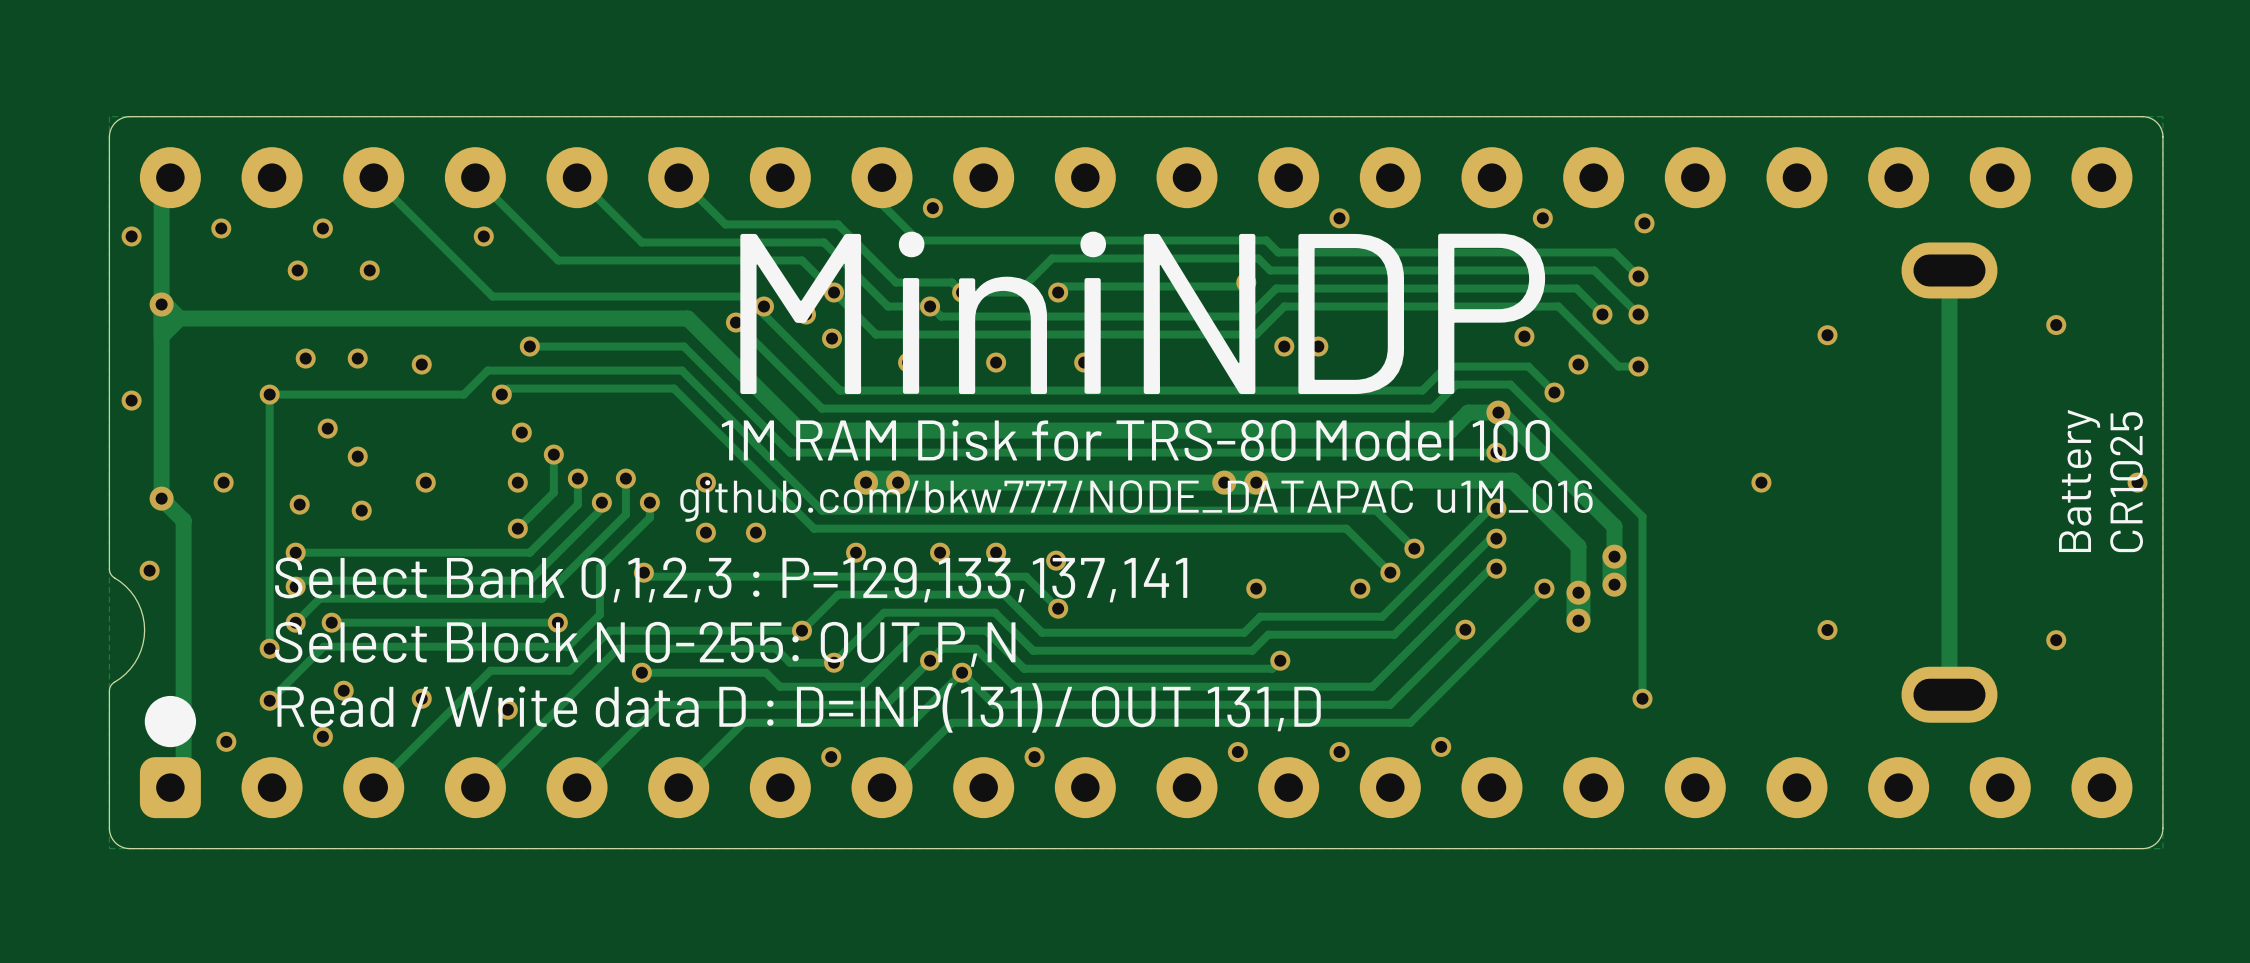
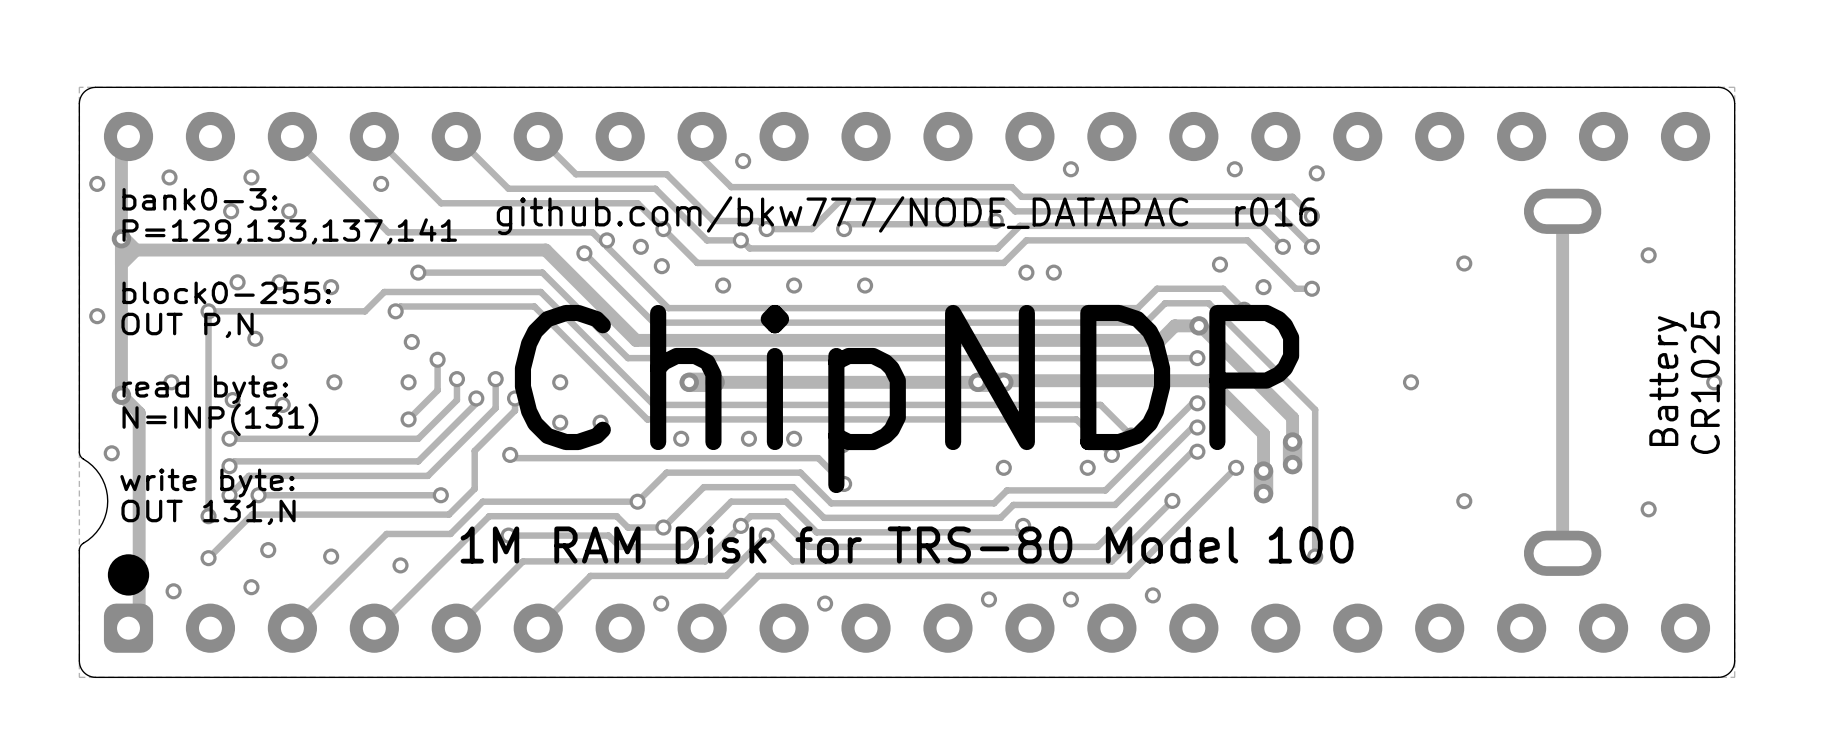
text: none -> bank0-3: (199, 199)
text: none -> github.com/bkw777/NODE_DATAPAC r016 (907, 215)
text: none -> P=129,133,137,141 (289, 231)
text: MiniNDP (1142, 312) -> none
text: none -> block0-255: (226, 292)
text: none -> OUT P,N (187, 325)
text position: 1M RAM Disk for TRS-80 Model 100 (1135, 440) -> 1M RAM Disk for TRS-80 Model 100 (907, 545)
text: none -> read byte: (205, 389)
text: github.com/bkw777/NODE_DATAPAC u1M_016 (1136, 500) -> ChipNDP (907, 399)
text: none -> N=INP(131) (220, 419)
text: Select Bank 0,1,2,3 : P=129,133,137,141 (731, 579) -> none
text: none -> write byte: (207, 483)
text: none -> OUT 131,N (208, 512)
text: Select Block N 0-255: OUT P,N (645, 644) -> none
text: Read / Write data D : D=INP(131) / OUT 131,D (799, 707) -> none

